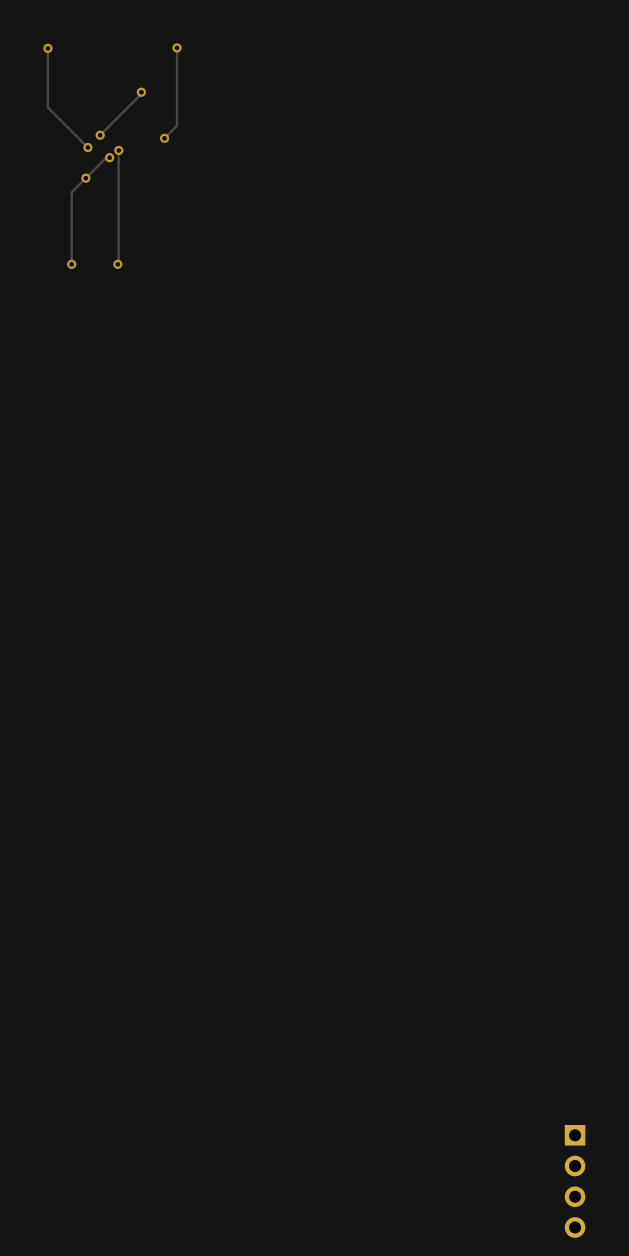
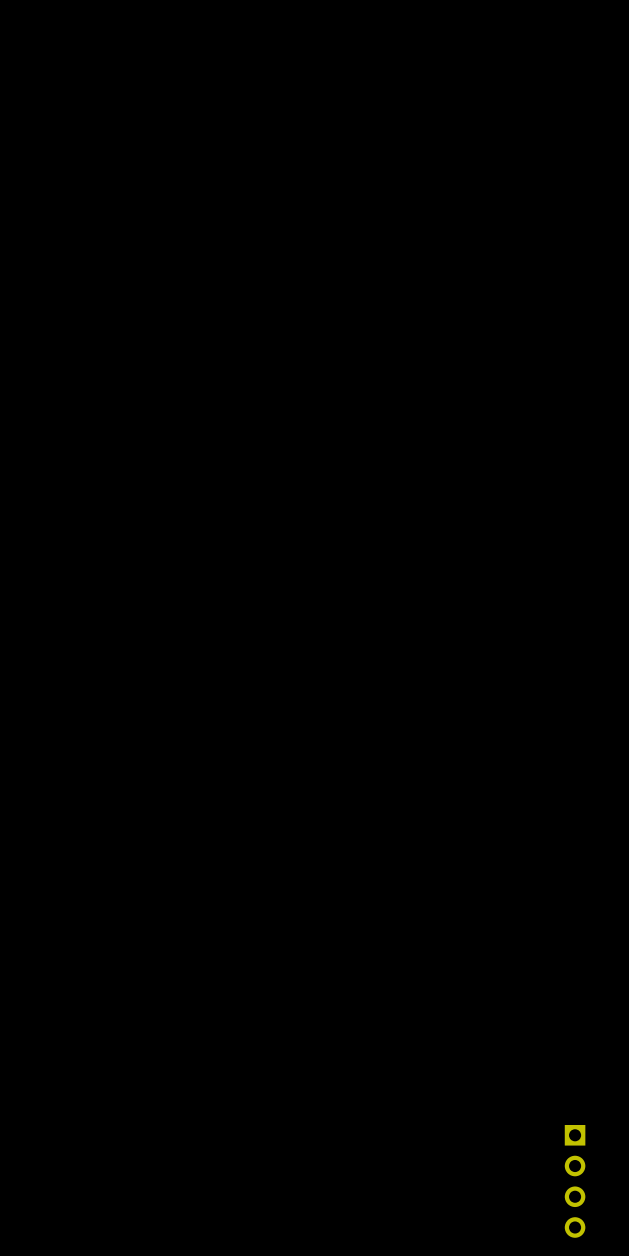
track: (177, 47) (177, 125) (164, 138) -> none
via: (177, 47) -> none
track: (47, 48) (47, 107) (87, 147) -> none
via: (47, 48) -> none
track: (141, 92) (100, 135) -> none
via: (141, 92) -> none
via: (100, 135) -> none
via: (164, 138) -> none
via: (87, 147) -> none
track: (118, 150) (117, 264) -> none
via: (118, 150) -> none
track: (109, 157) (106, 157) (71, 192) (71, 264) -> none
via: (109, 157) -> none
via: (85, 178) -> none
via: (71, 264) -> none
via: (117, 264) -> none

